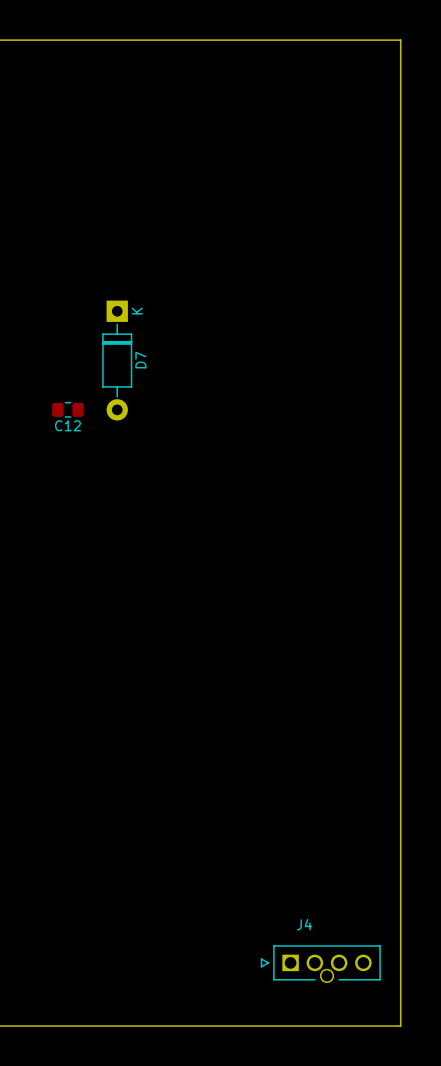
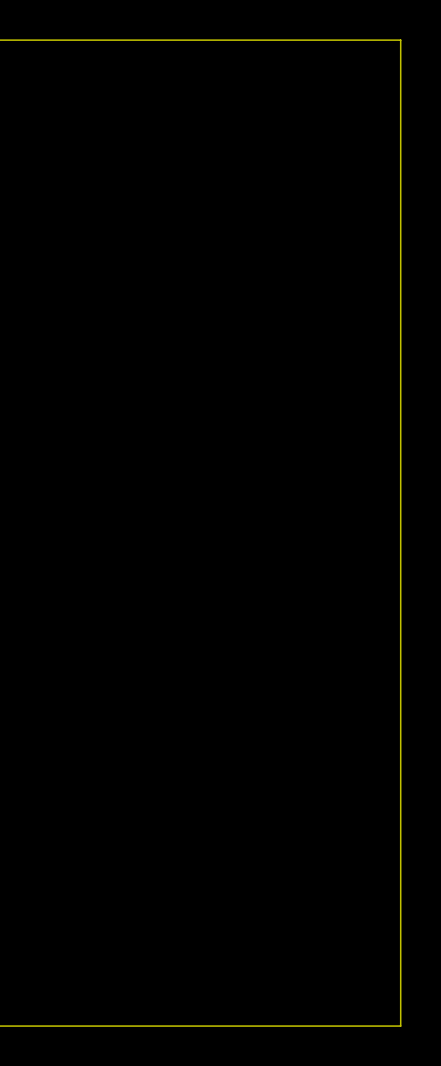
D7: (117, 360) -> none
C12: (67, 409) -> none
J4: (320, 963) -> none

